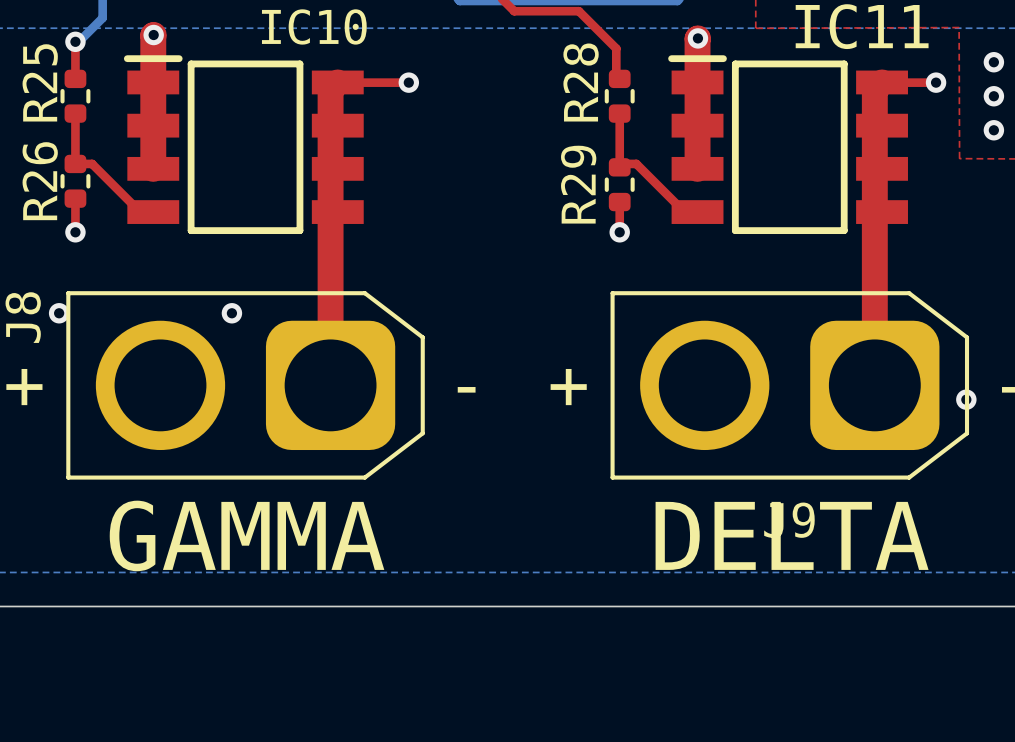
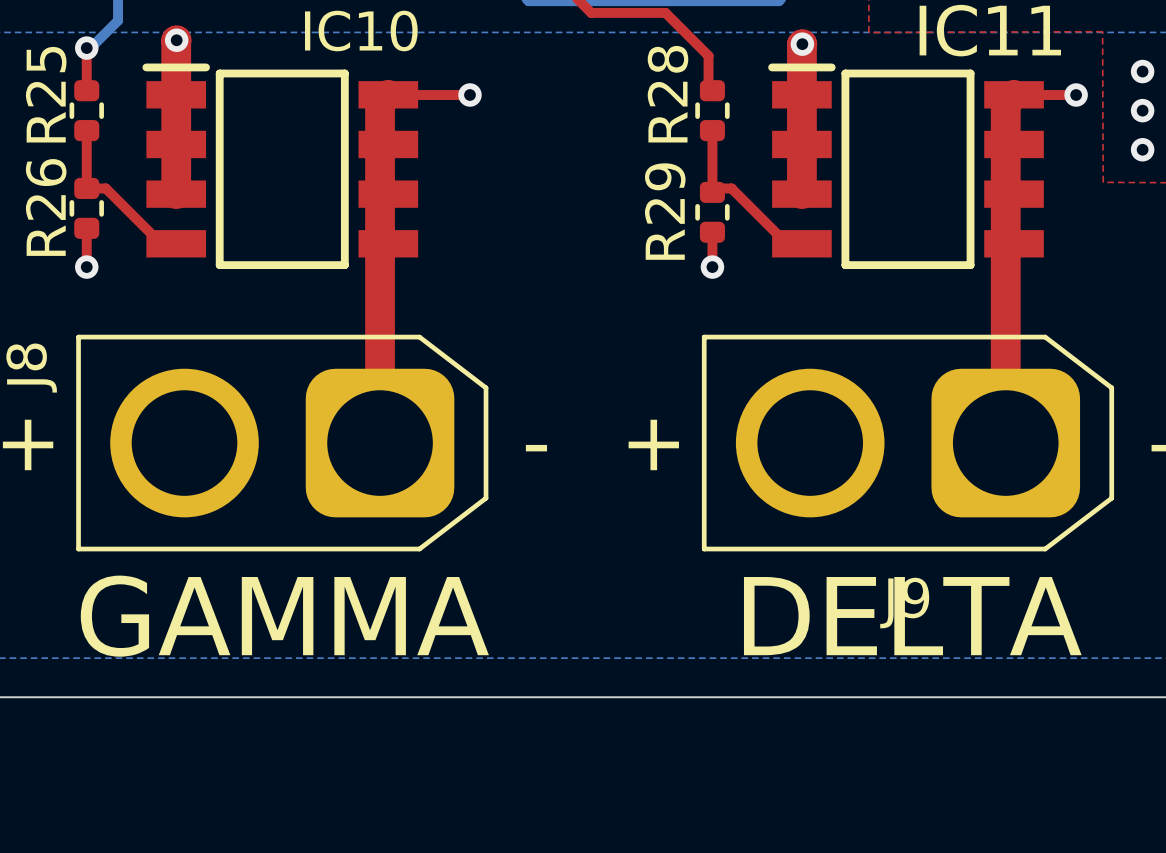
via: (59, 313) -> none
via: (231, 313) -> none
via: (966, 399) -> none

